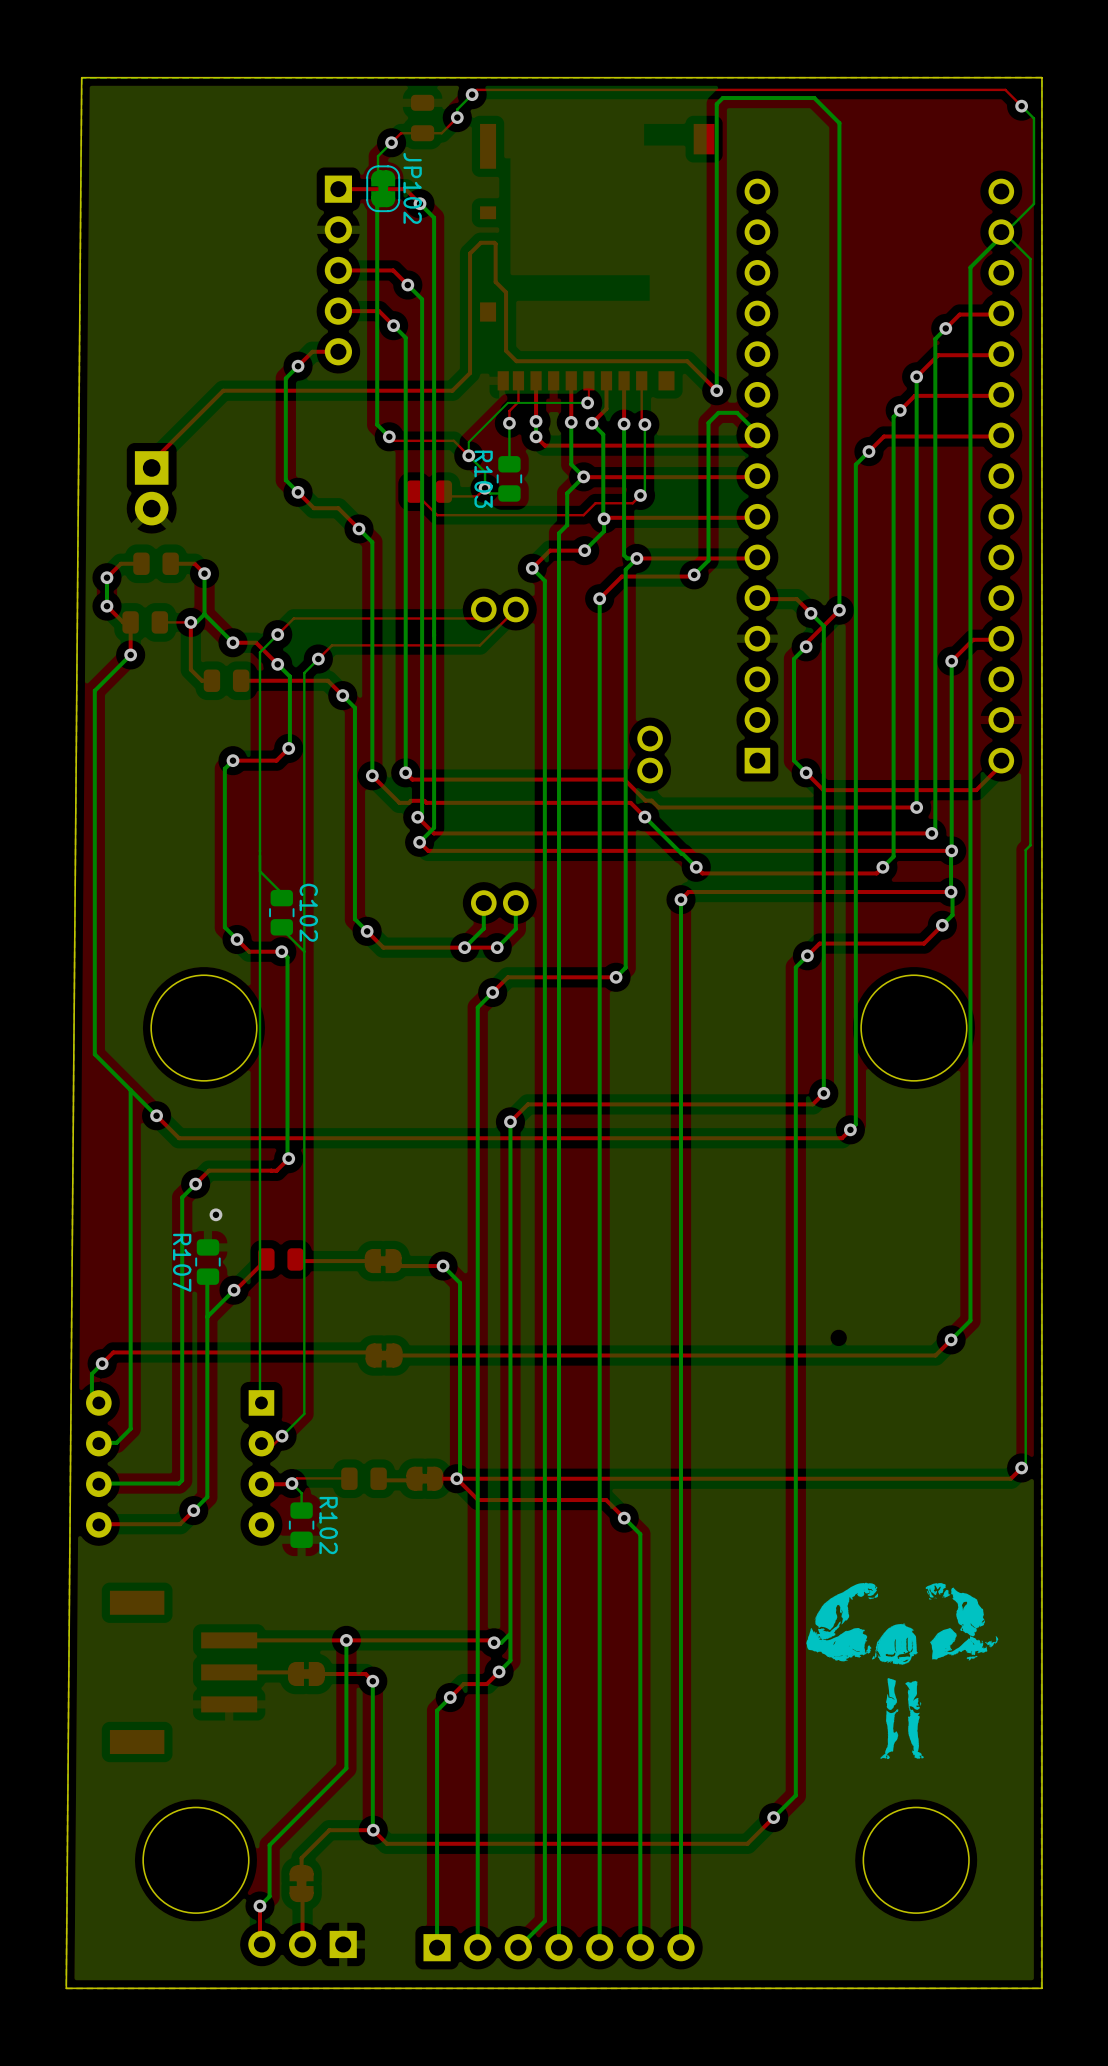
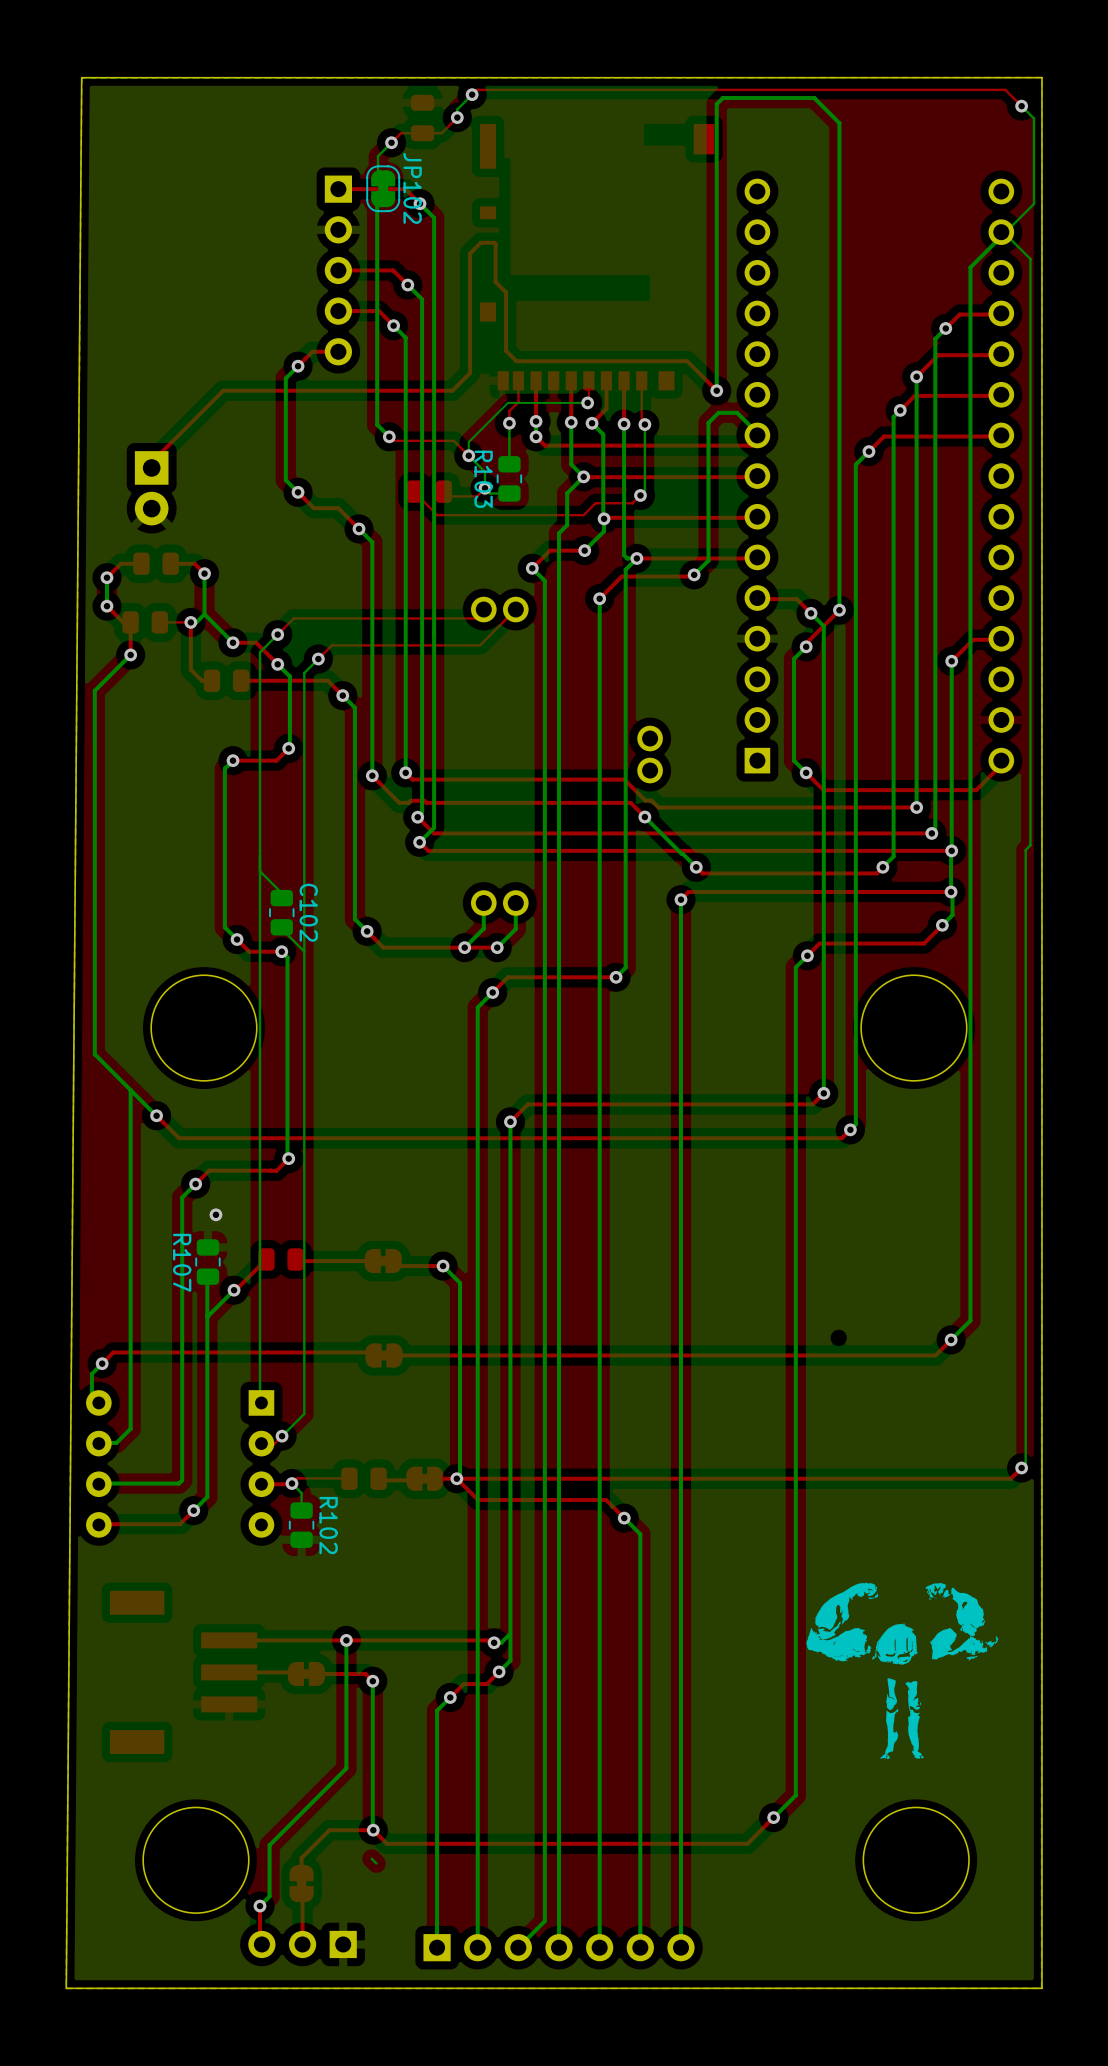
bottom track: none -> (371, 1858) (376, 1863)

